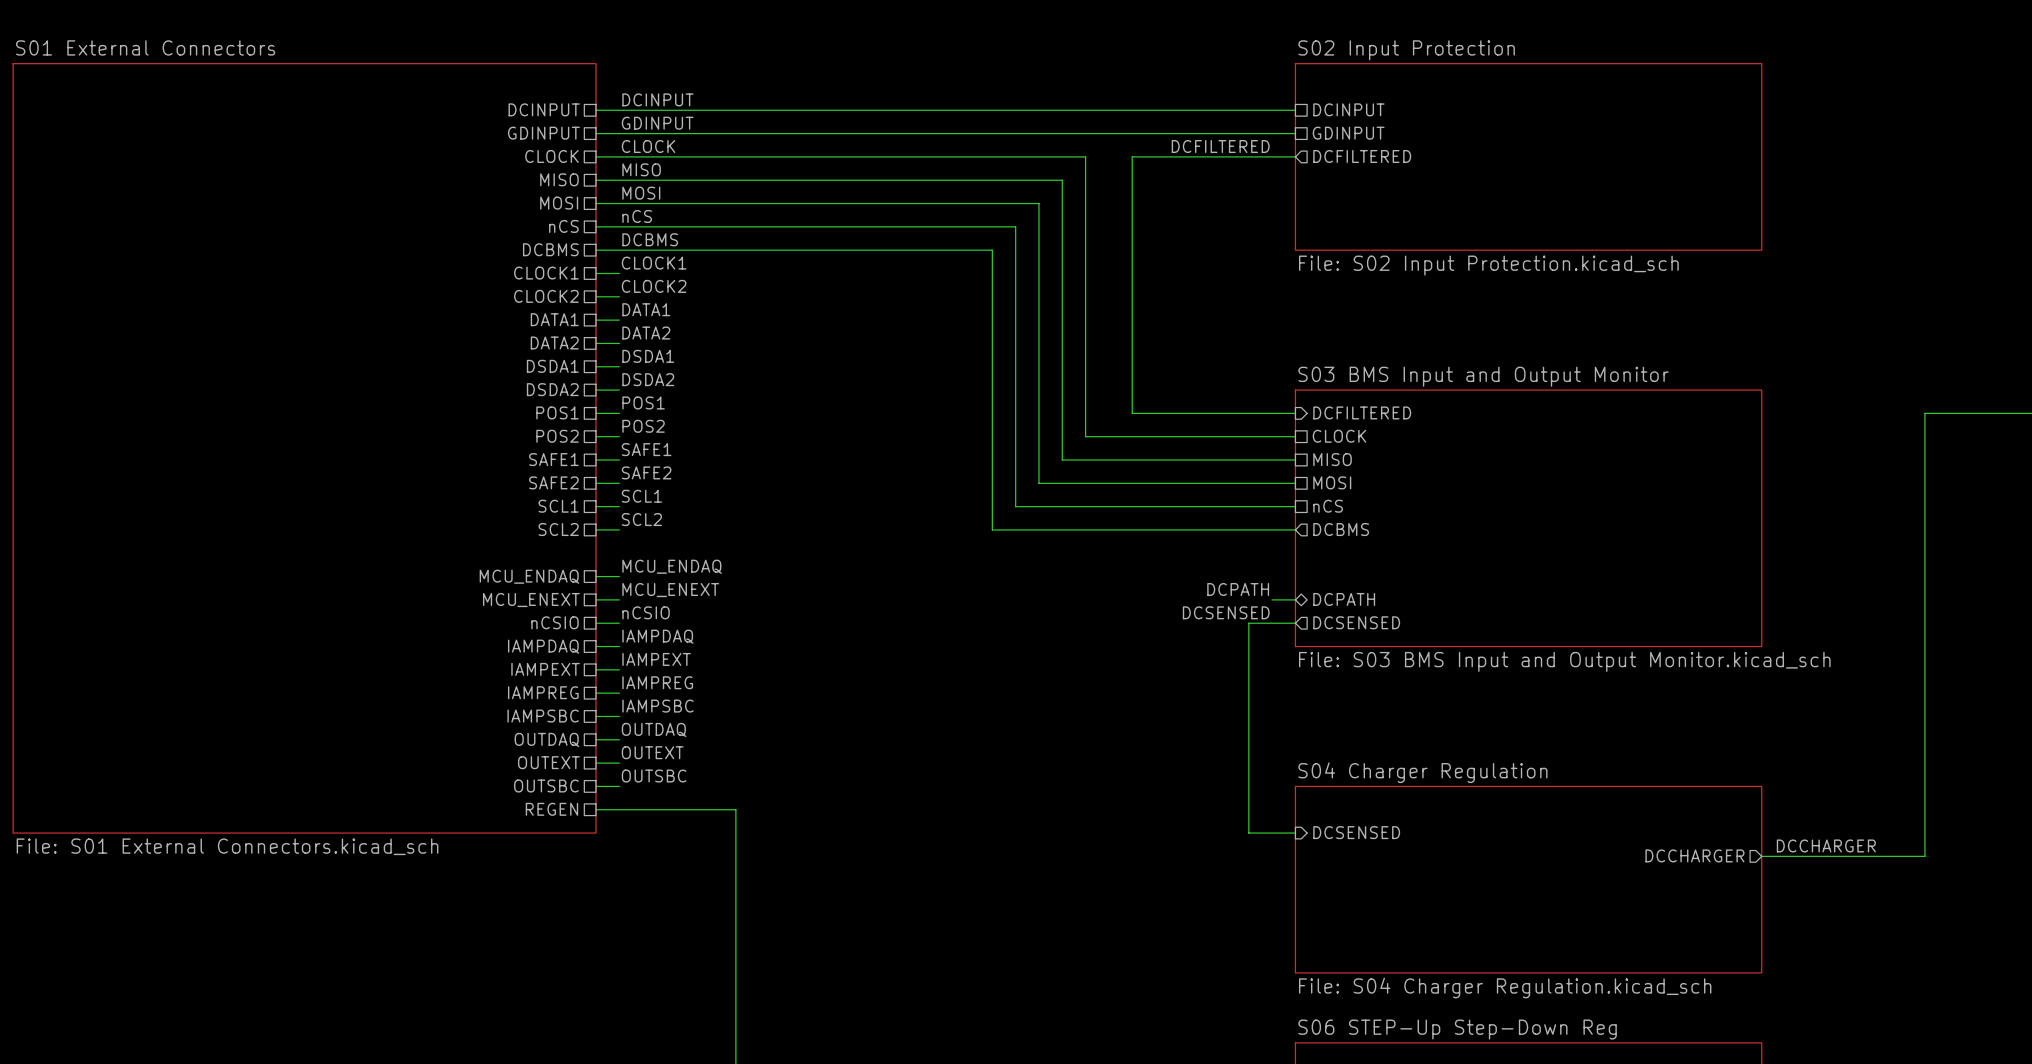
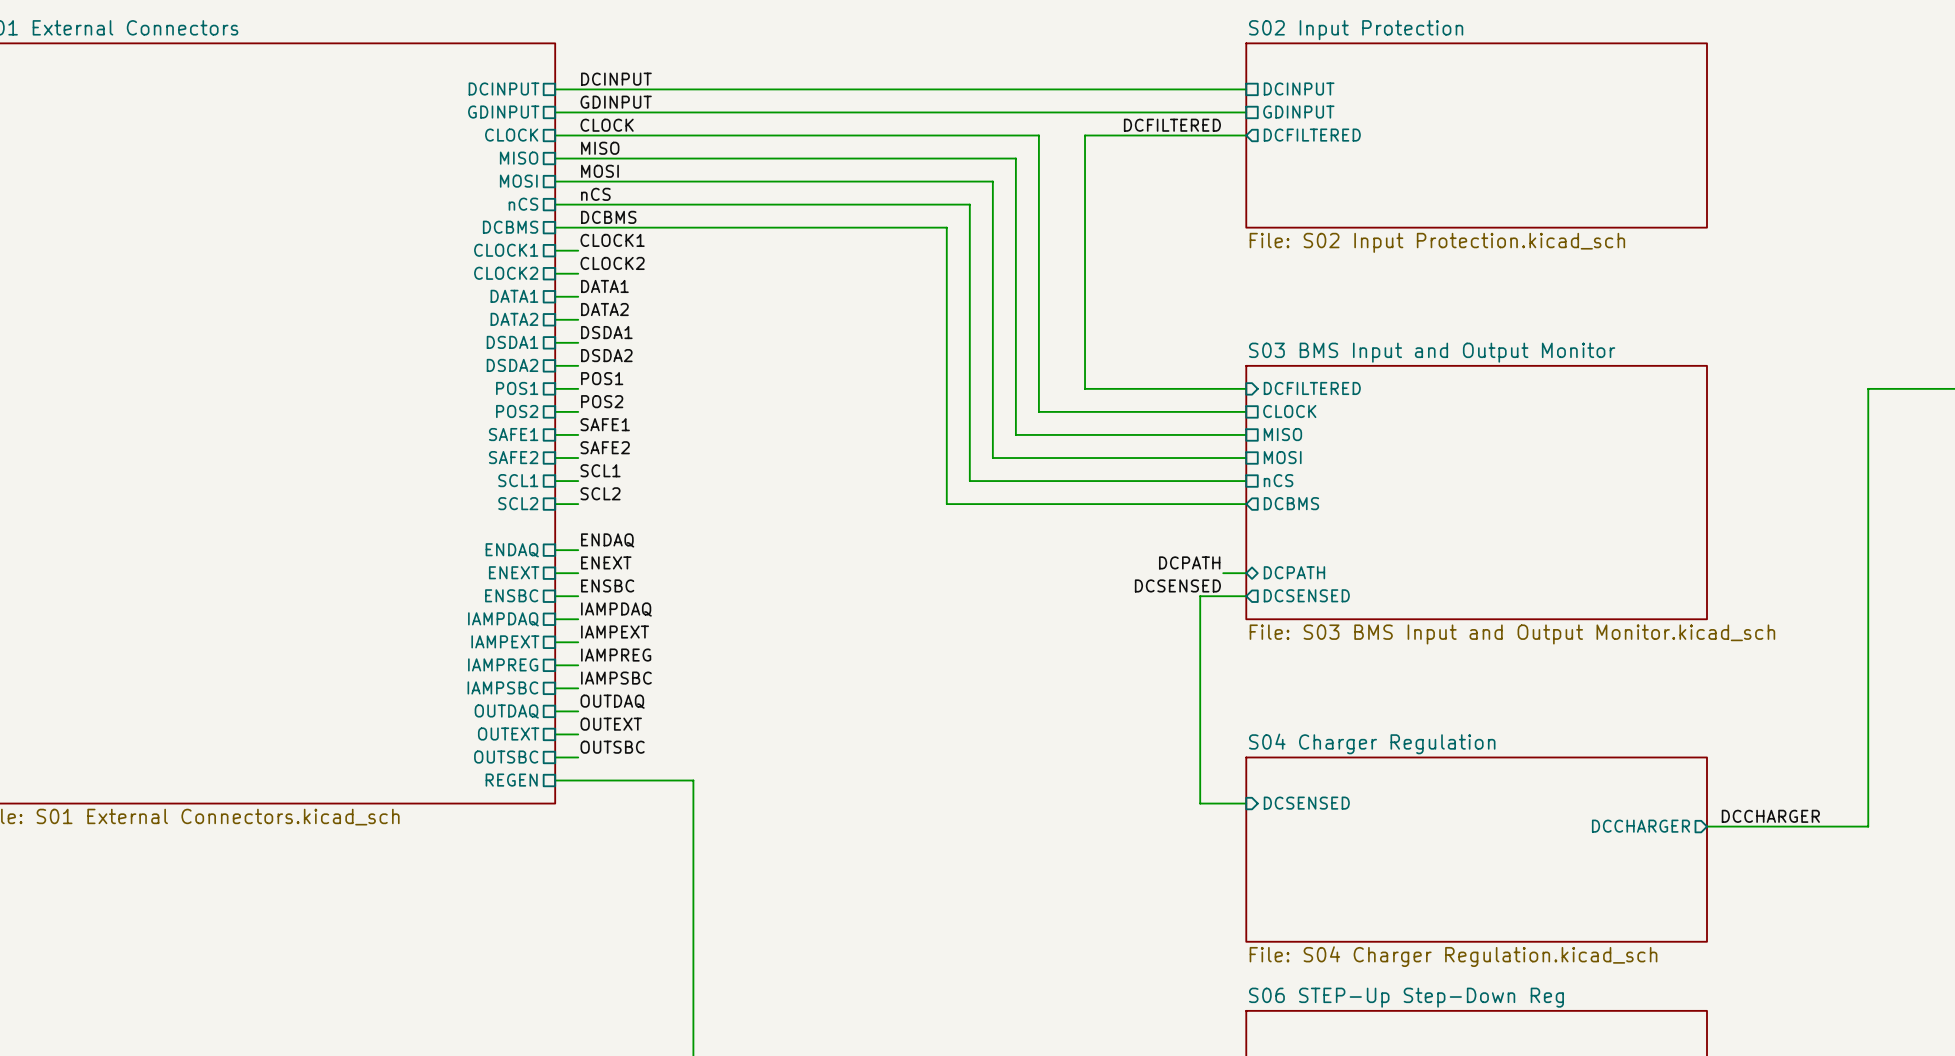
label: MCU_ENDAQ (672, 566) -> ENDAQ (607, 540)
sheet pin: MCU_ENDAQ (529, 576) -> ENDAQ (512, 550)
label: MCU_ENEXT (670, 590) -> ENEXT (606, 562)
sheet pin: MCU_ENEXT (531, 600) -> ENEXT (514, 572)
label: nCSIO (646, 612) -> ENSBC (607, 585)
sheet pin: nCSIO (555, 622) -> ENSBC (511, 595)

